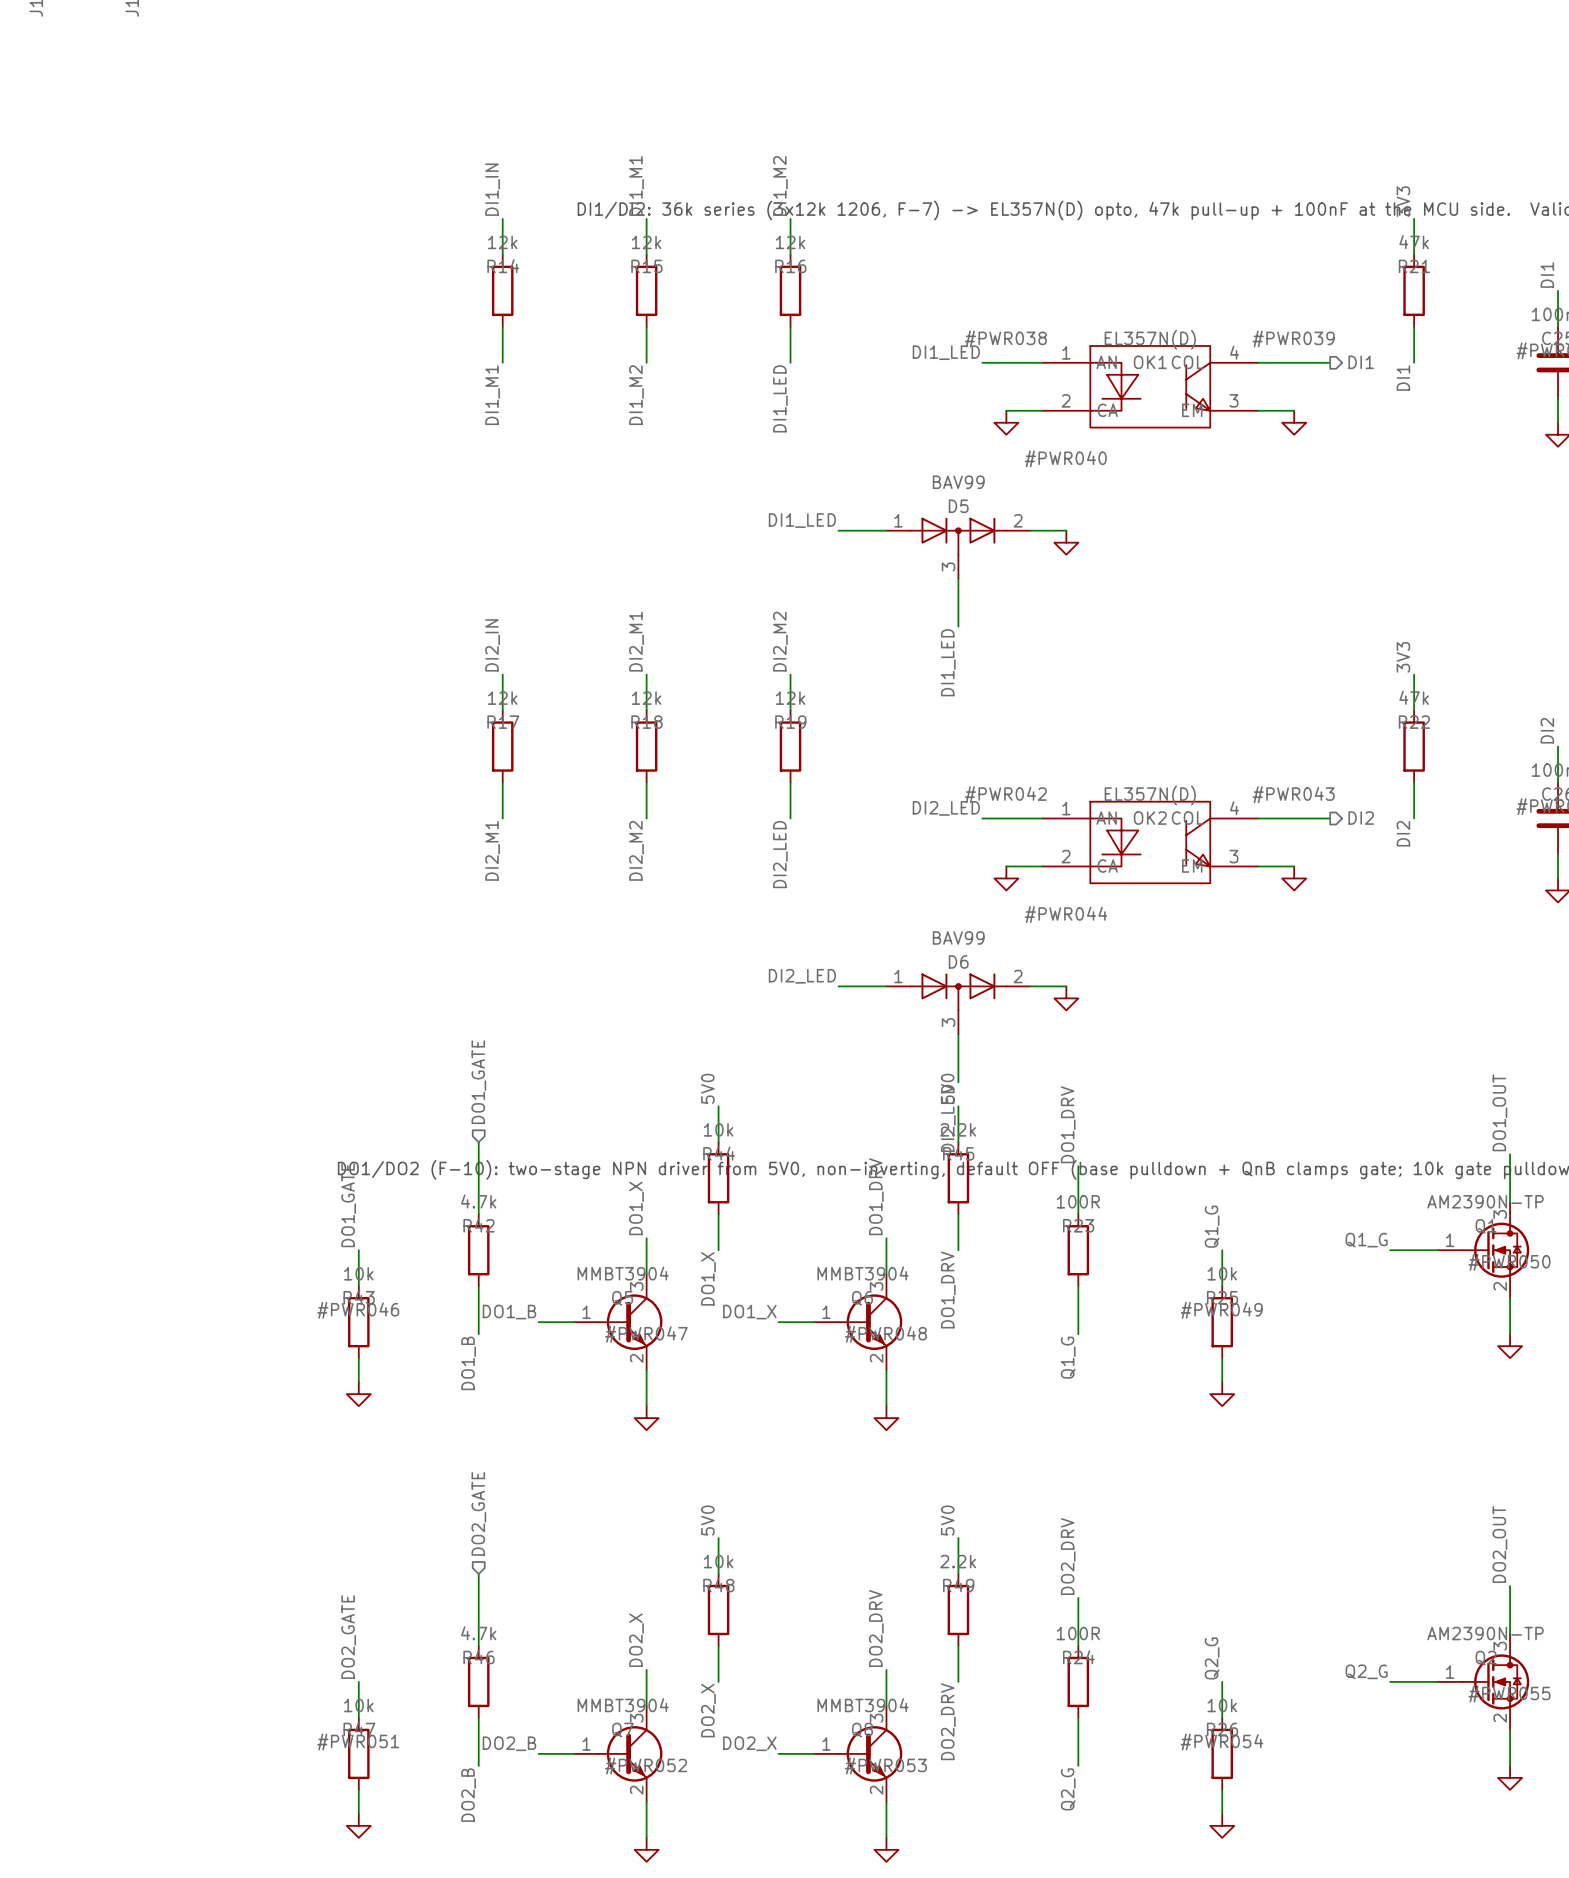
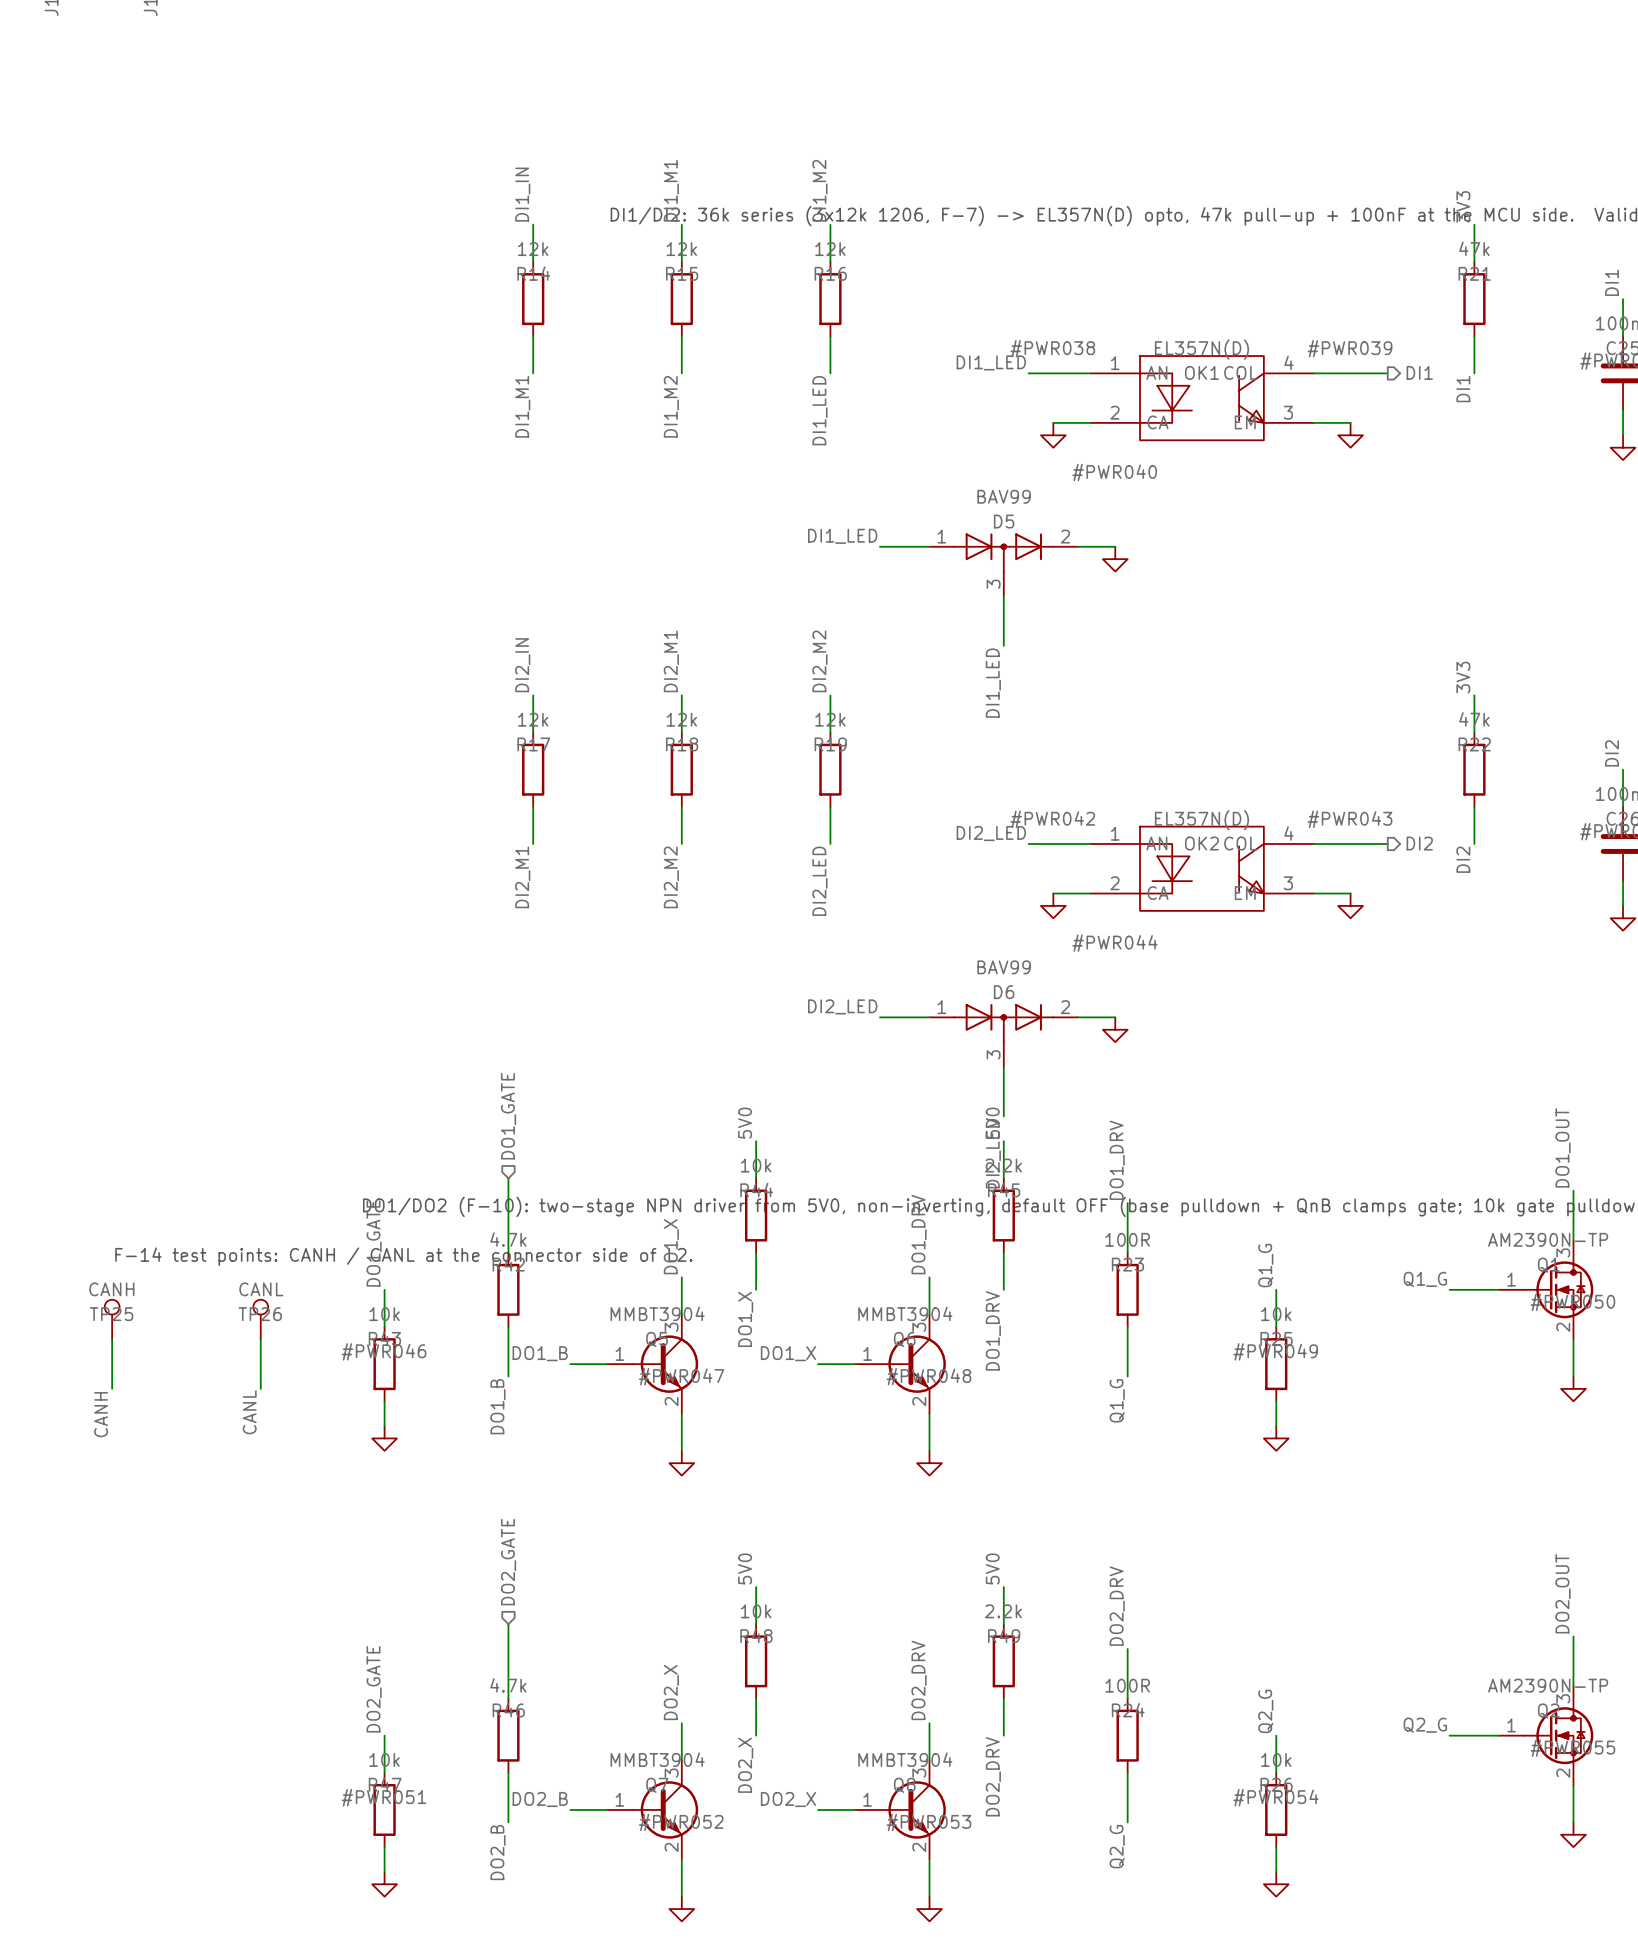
text: none -> F-14 test points: CANH / CANL at the connector side of L2. (403, 1256)
TP25: none -> CANH (112, 1319)
TP26: none -> CANL (260, 1319)
wire: none -> (112, 1339) (112, 1388)
wire: none -> (260, 1339) (260, 1388)
label: none -> CANL (249, 1412)
label: none -> CANH (101, 1414)

